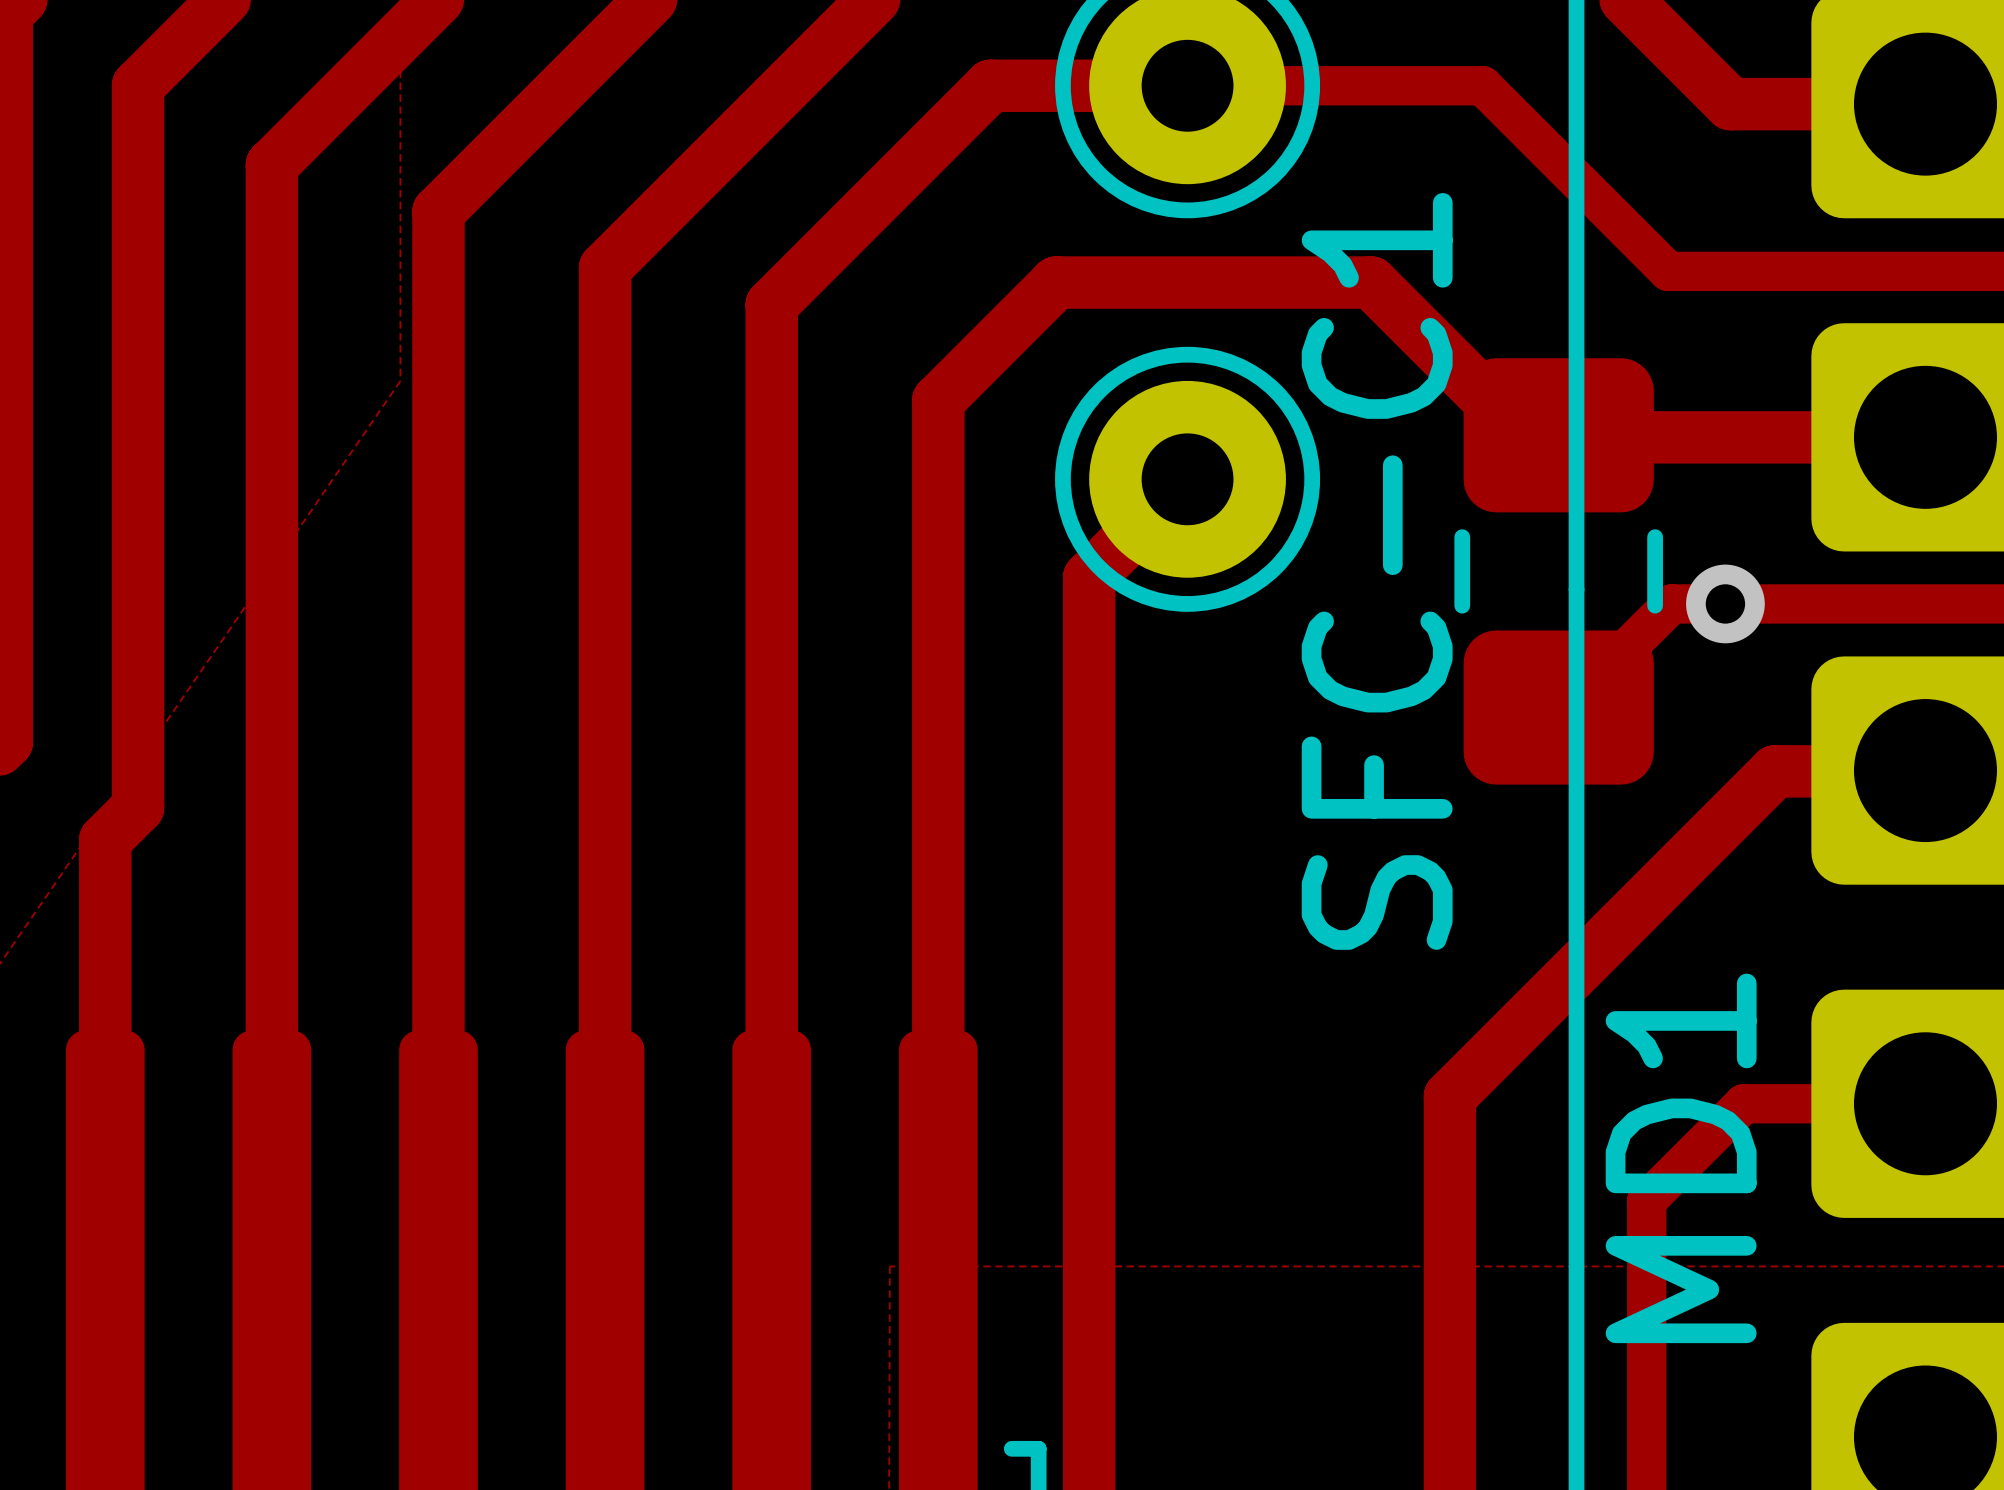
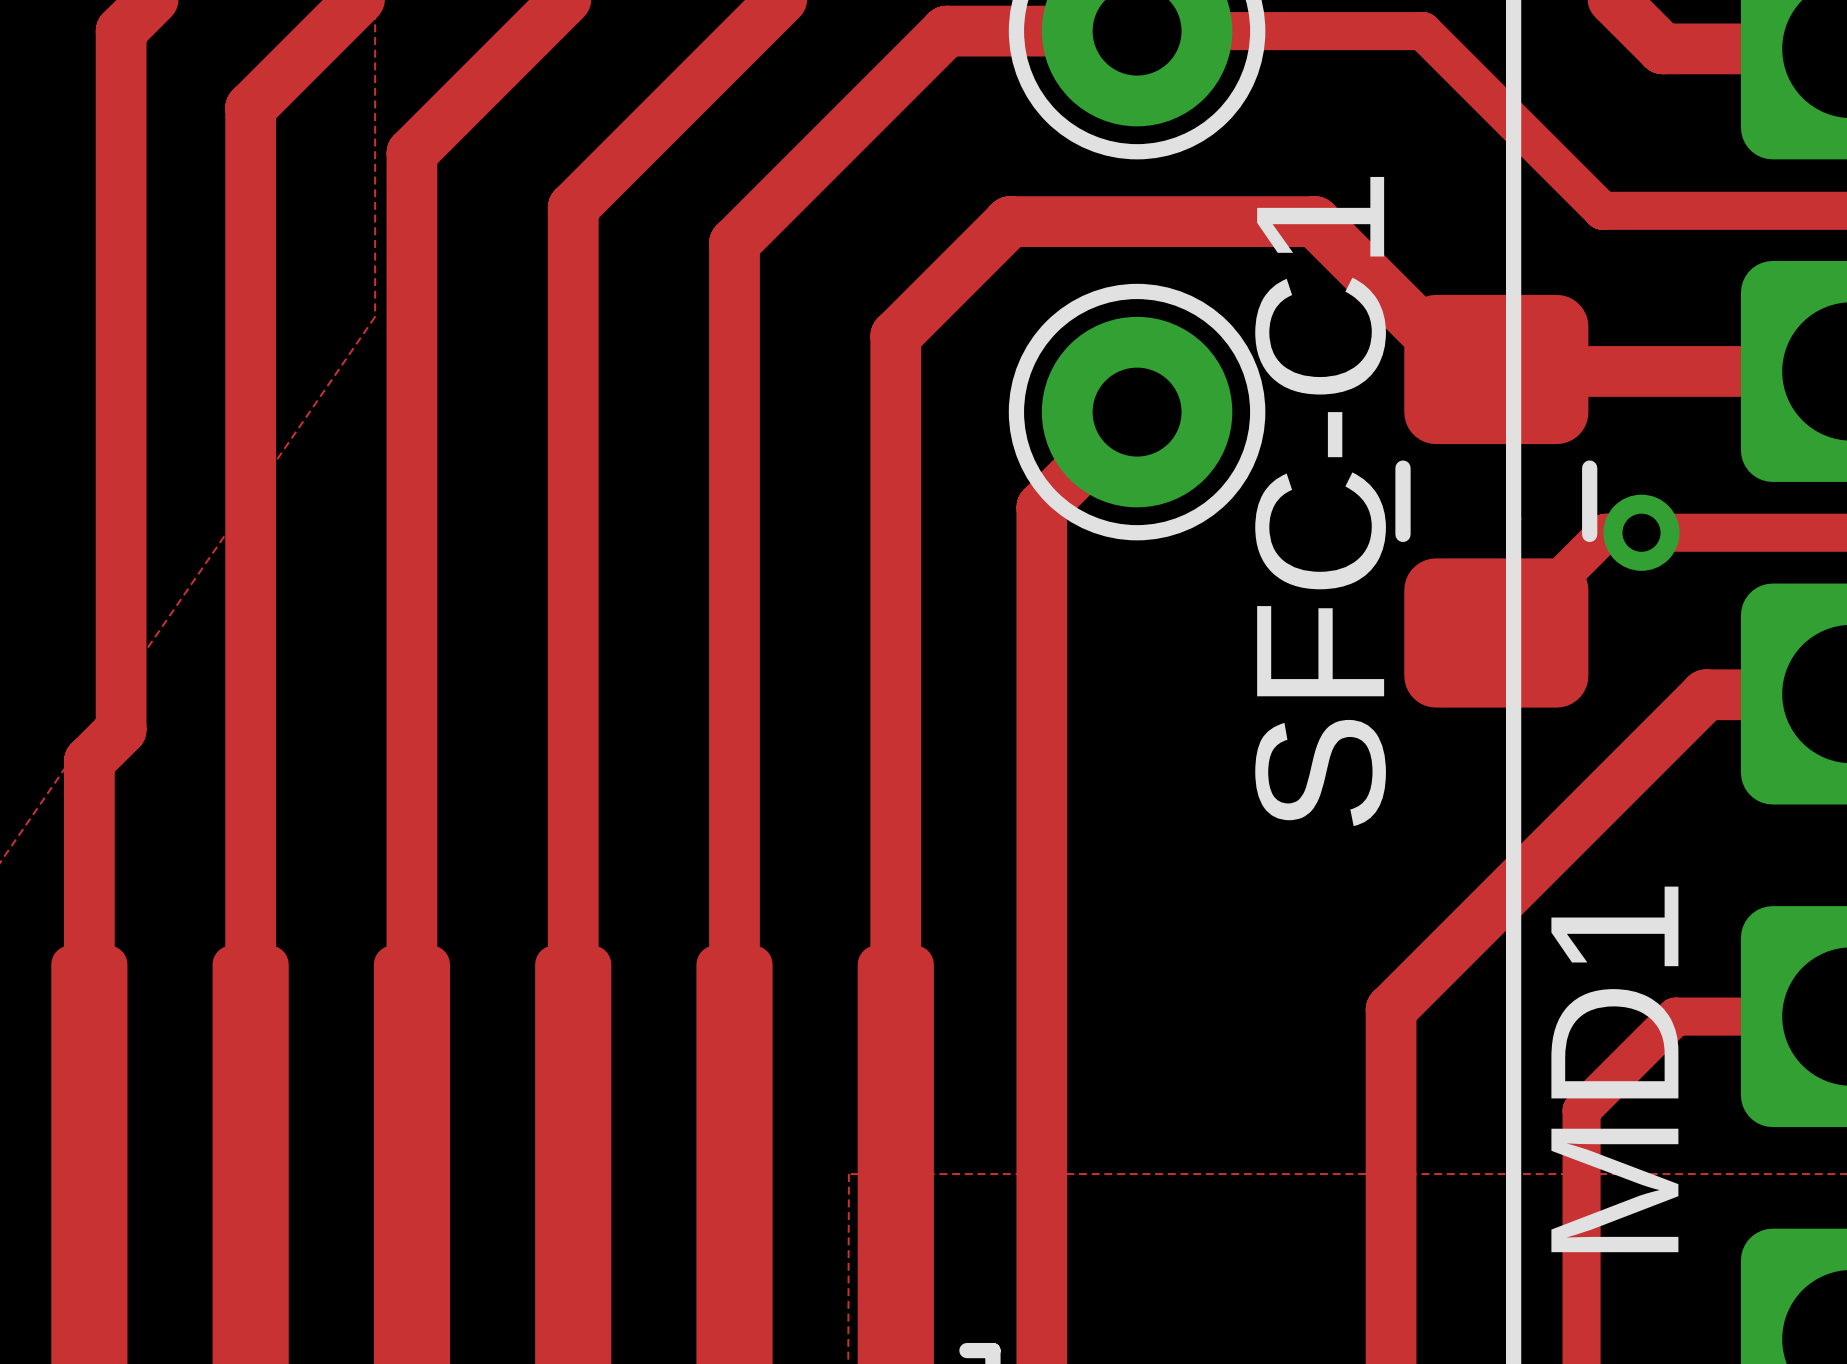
via position: (1725, 603) -> (1641, 532)

